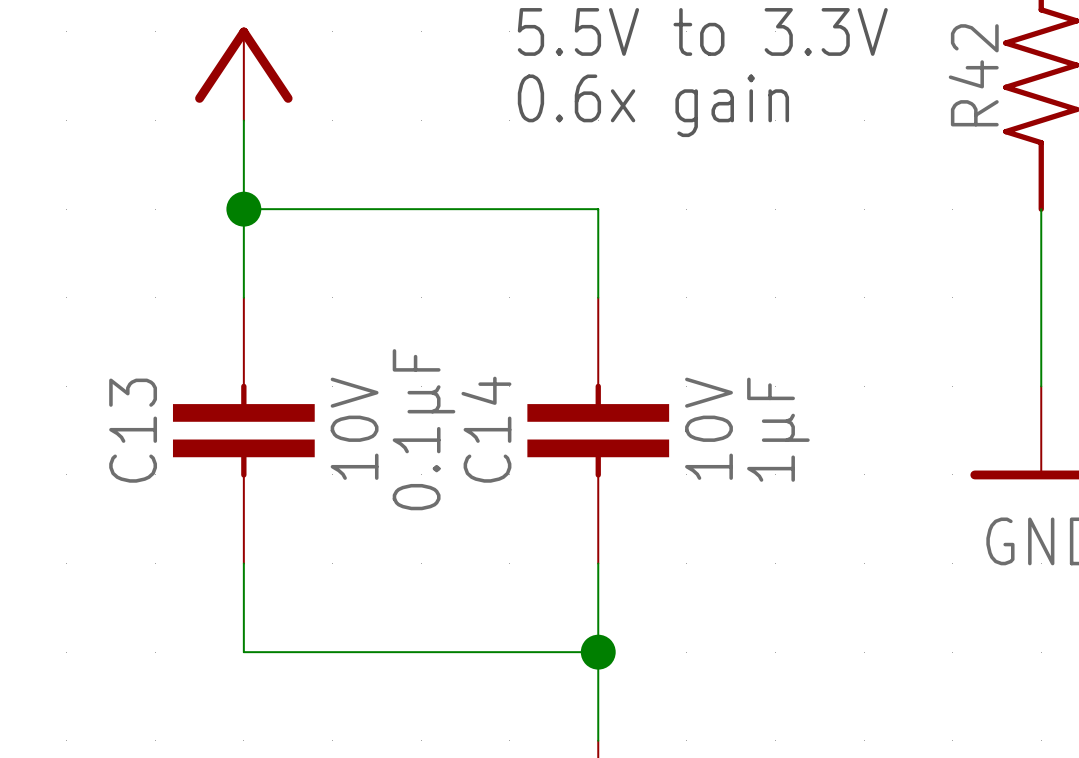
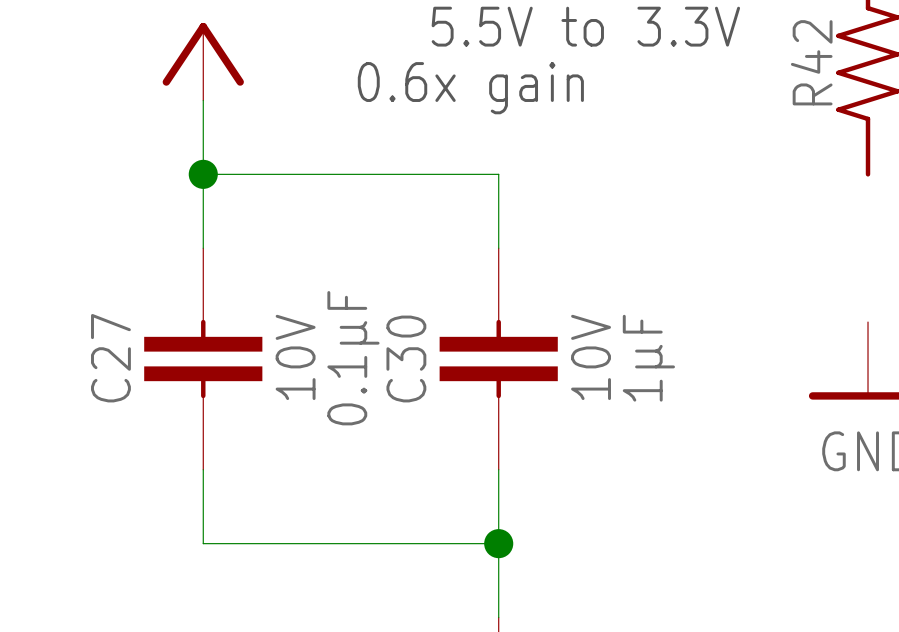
text position: 0.6x gain (653, 105) -> 0.6x gain (470, 88)
wire: (1041, 209) (1041, 386) -> none
C14 name: C14 (486, 429) -> C30 (406, 359)
C13 name: C13 (133, 430) -> C27 (110, 358)

